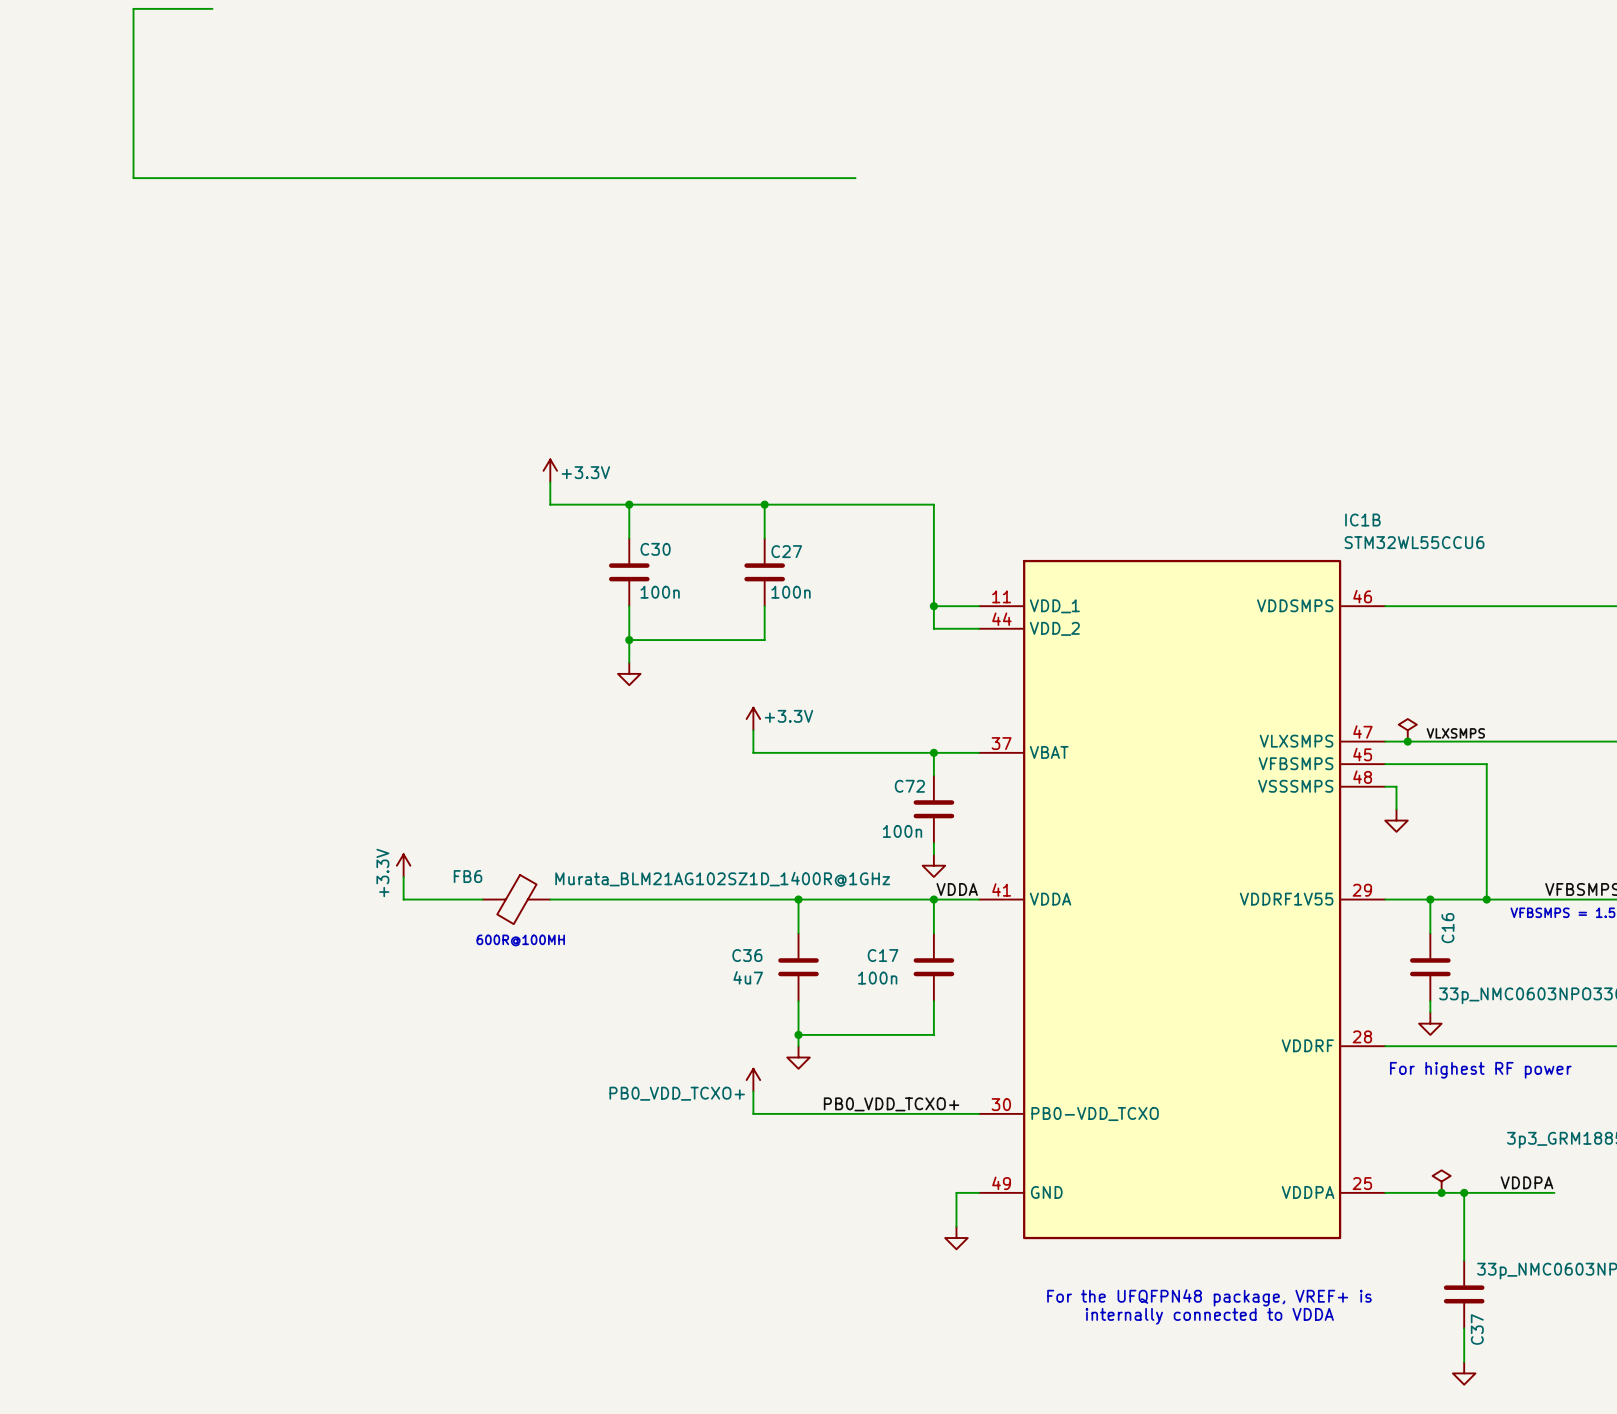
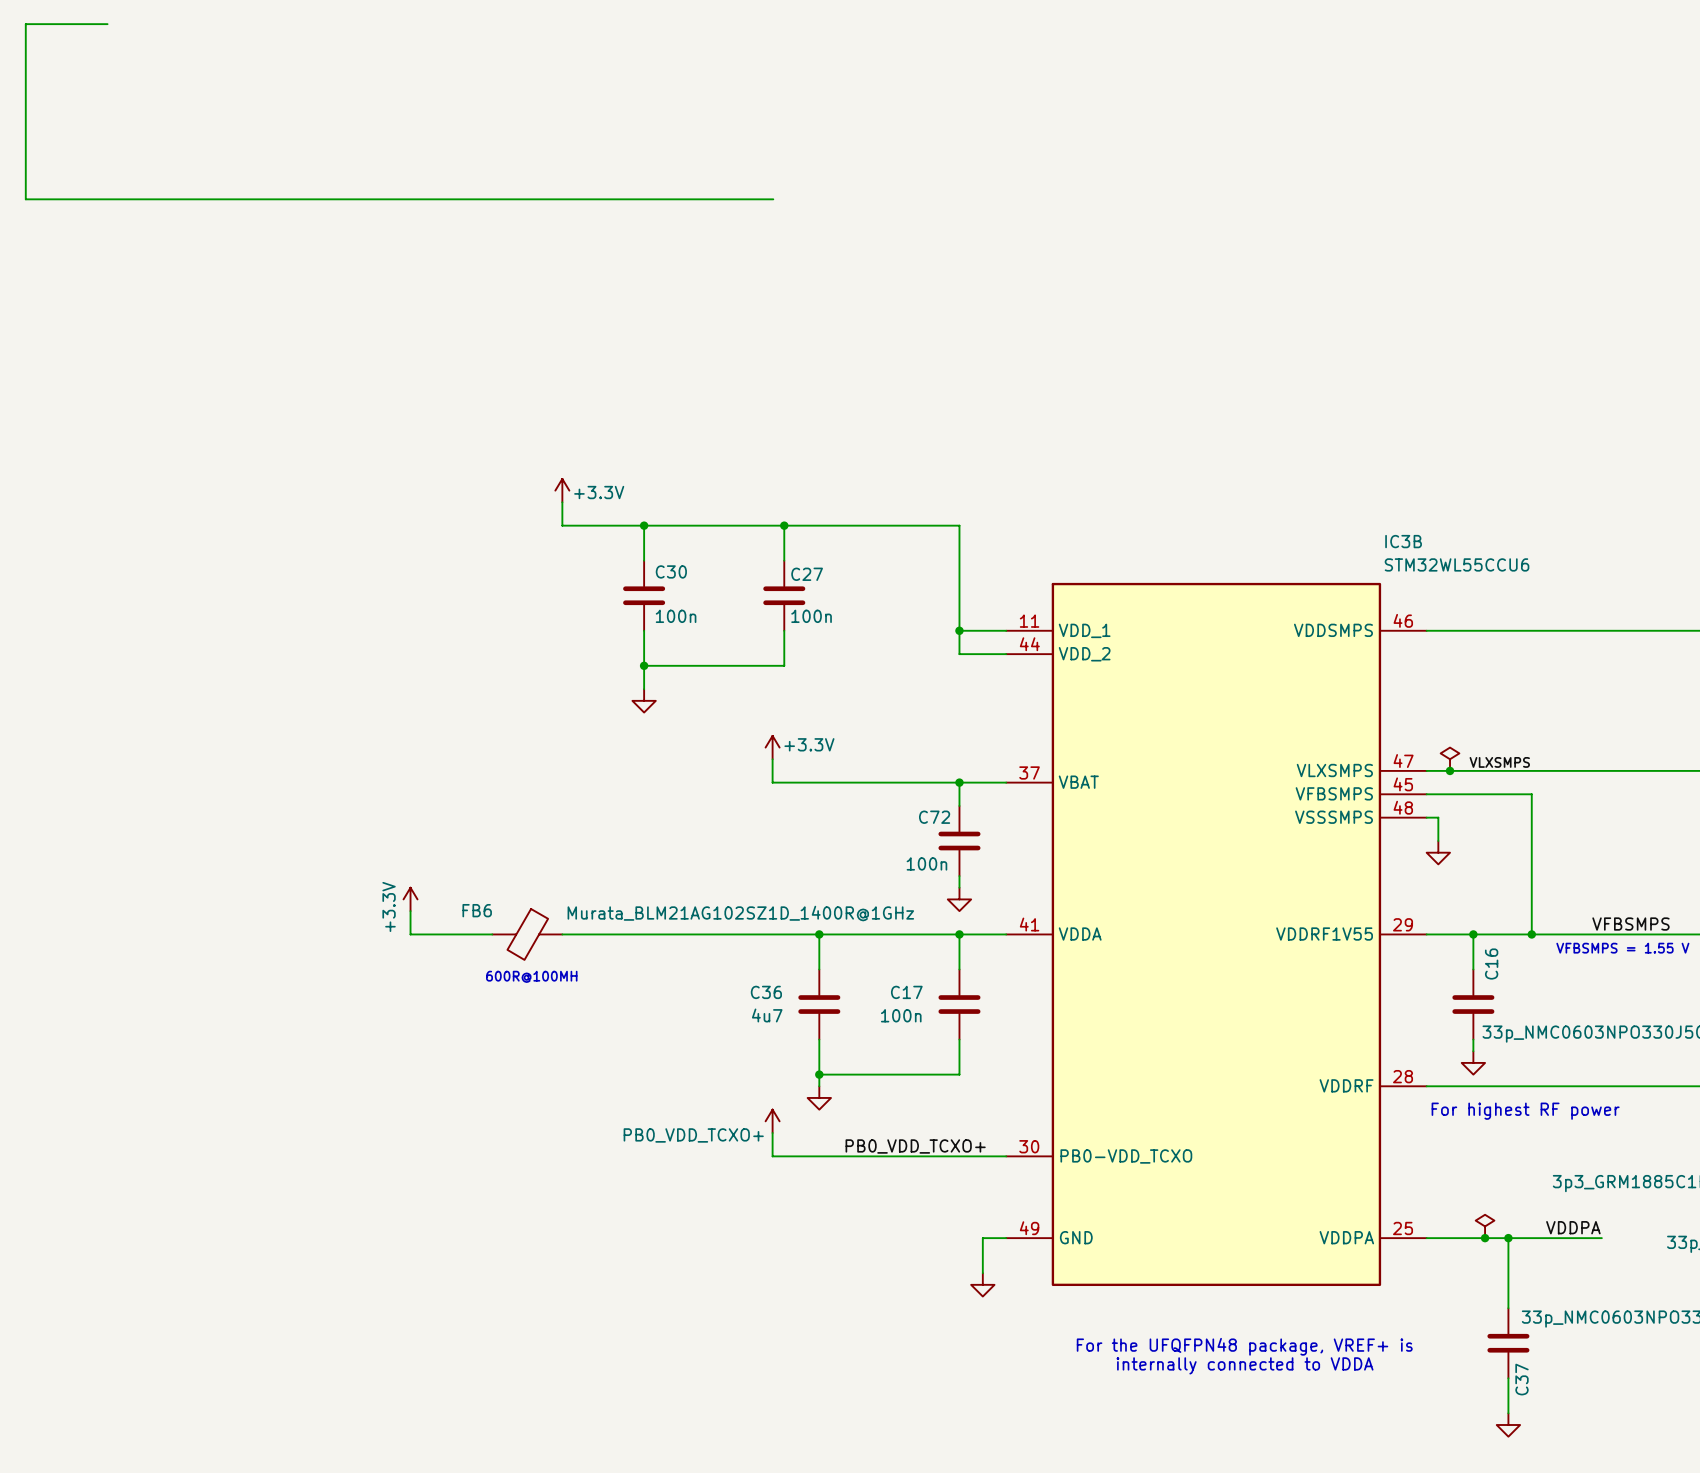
wire: (212, 8) (133, 8) (133, 178) (855, 178) -> (107, 24) (25, 24) (25, 199) (773, 199)
IC1B name: IC1B (1362, 520) -> IC3B (1403, 541)
label: VDDA (957, 889) -> none

